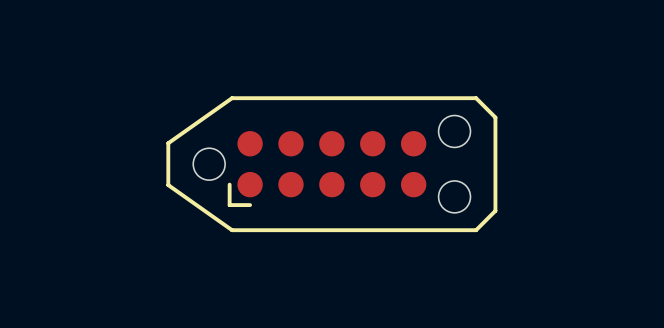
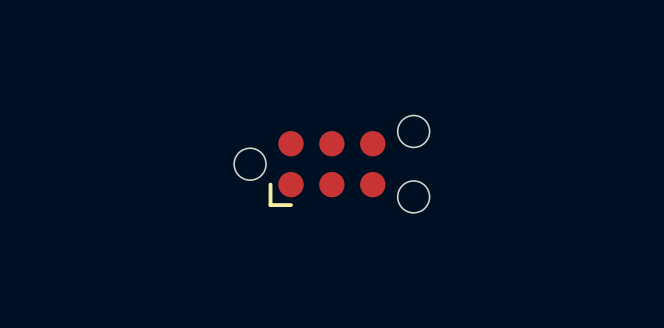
part footprint: [166, 96, 498, 233] -> [234, 115, 430, 213]

